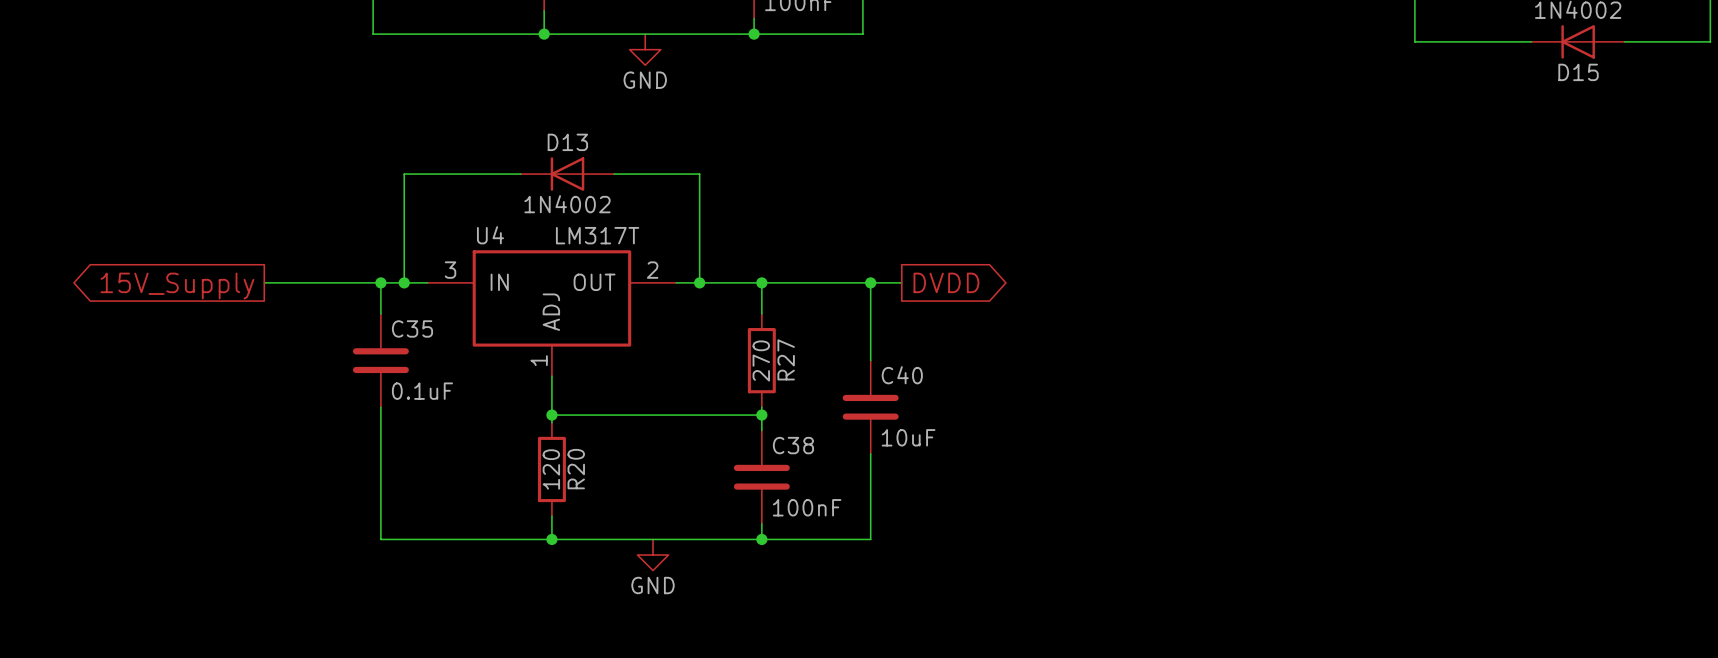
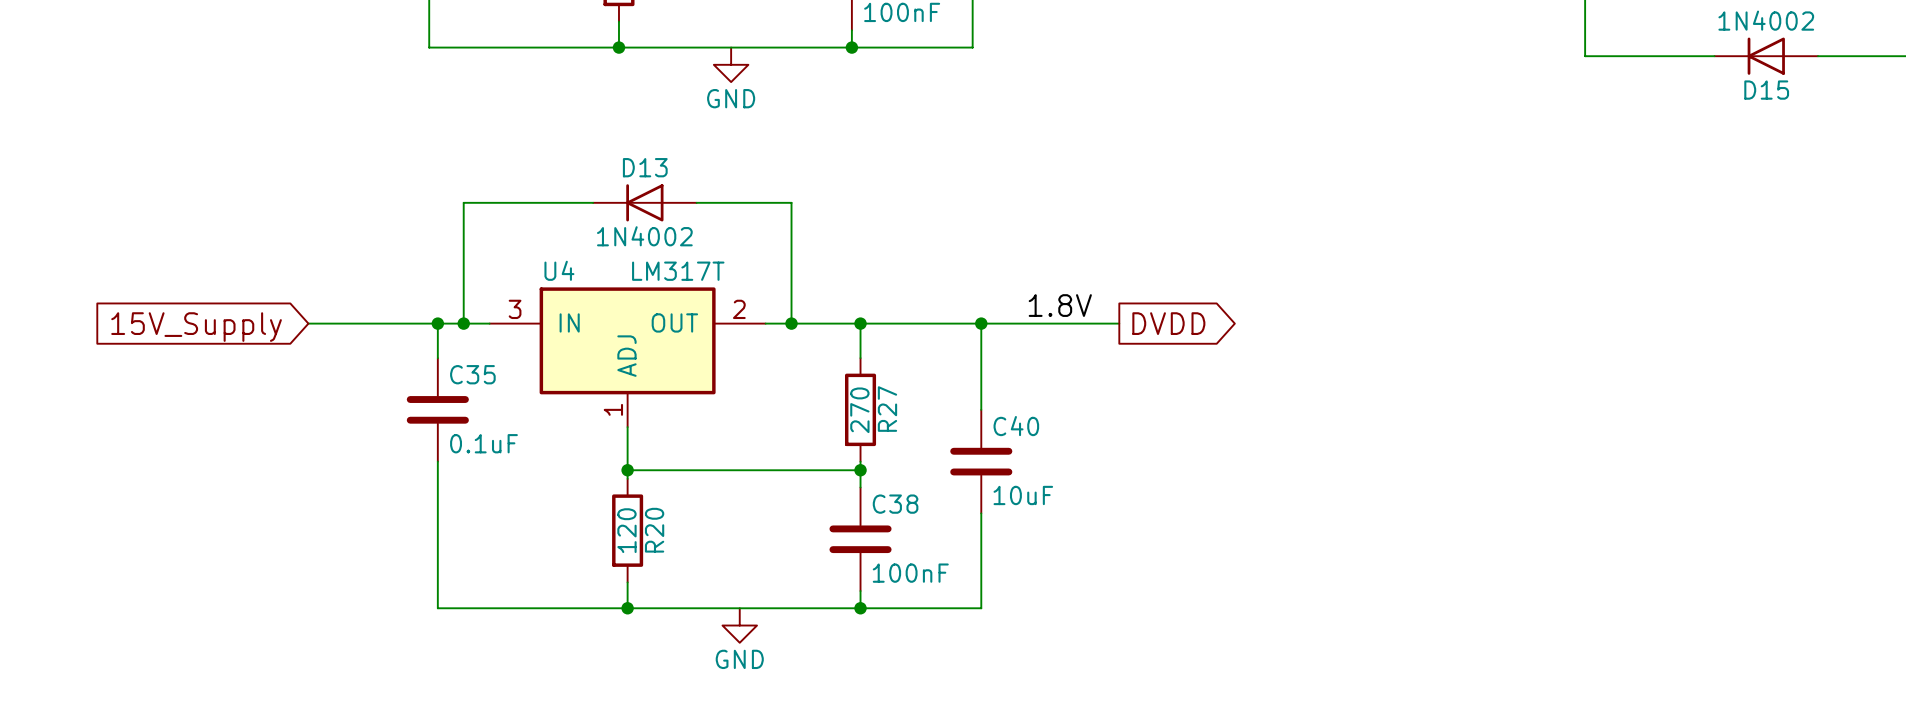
label: none -> 1.8V (1060, 305)
wire: none -> (1015, 323) (1119, 323)
global label position: DVDD (946, 282) -> DVDD (1168, 323)
global label shape: output (177, 286) -> input (196, 327)

